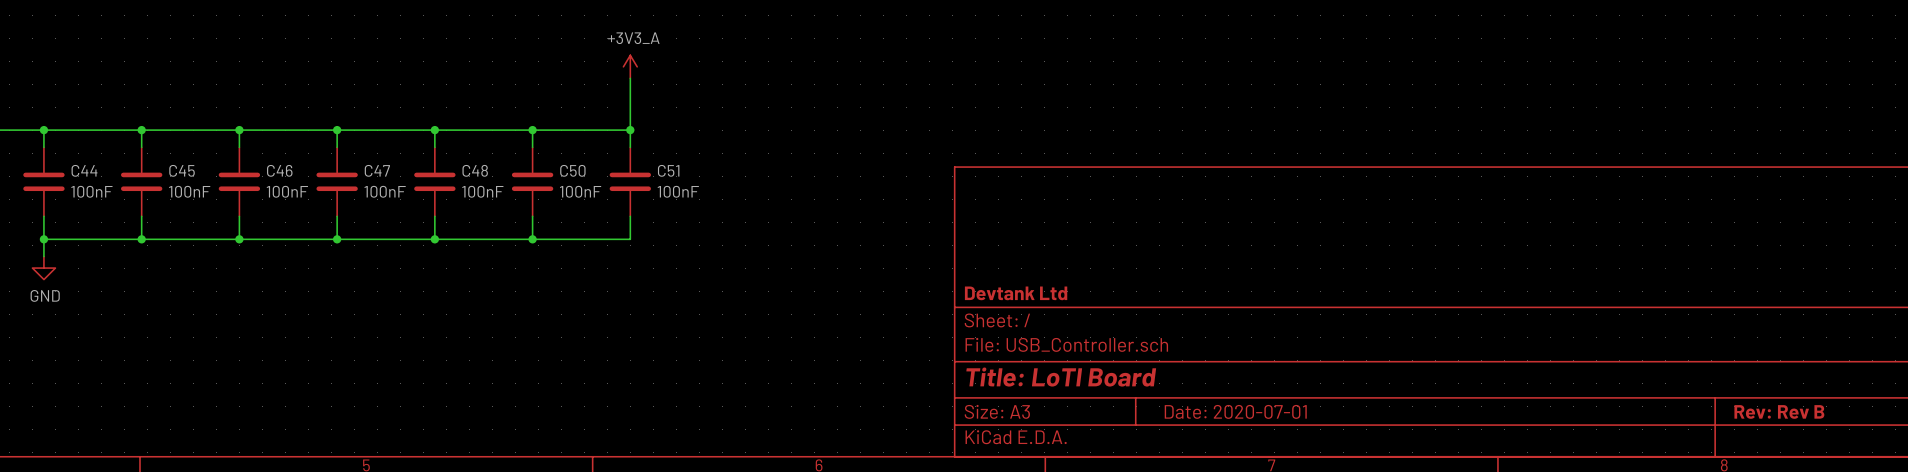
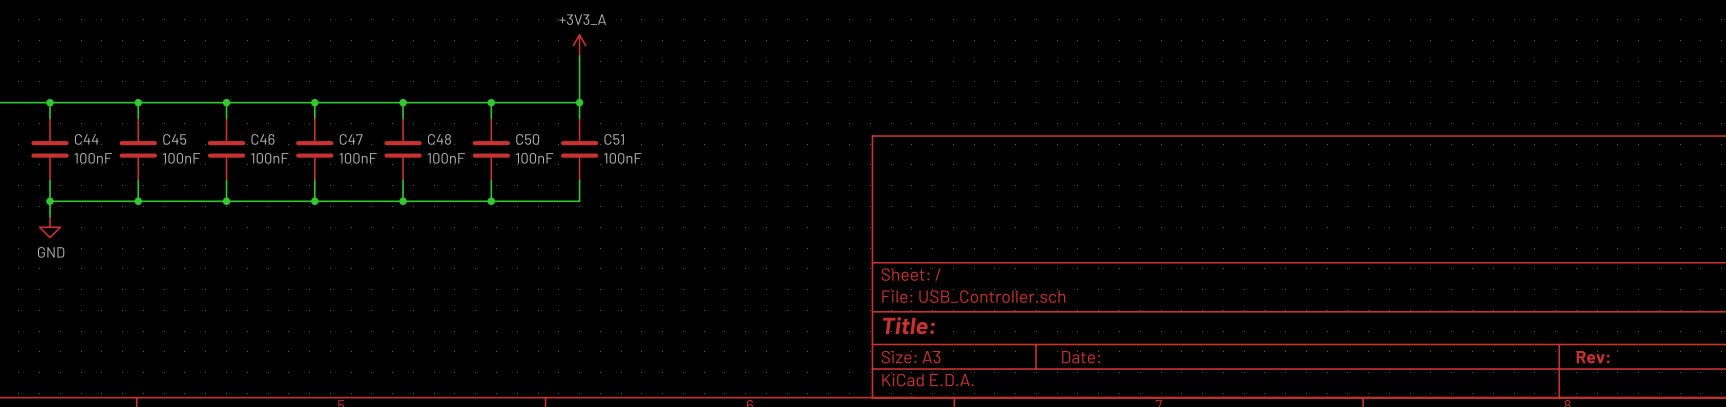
title block: Devtank Ltd (1016, 293) -> none
title block: Title: LoTI Board (1061, 377) -> Title: (908, 325)
title block: Date: 2020-07-01 (1235, 411) -> Date: (1081, 357)
title block: Rev: Rev B (1779, 411) -> Rev: (1593, 357)

